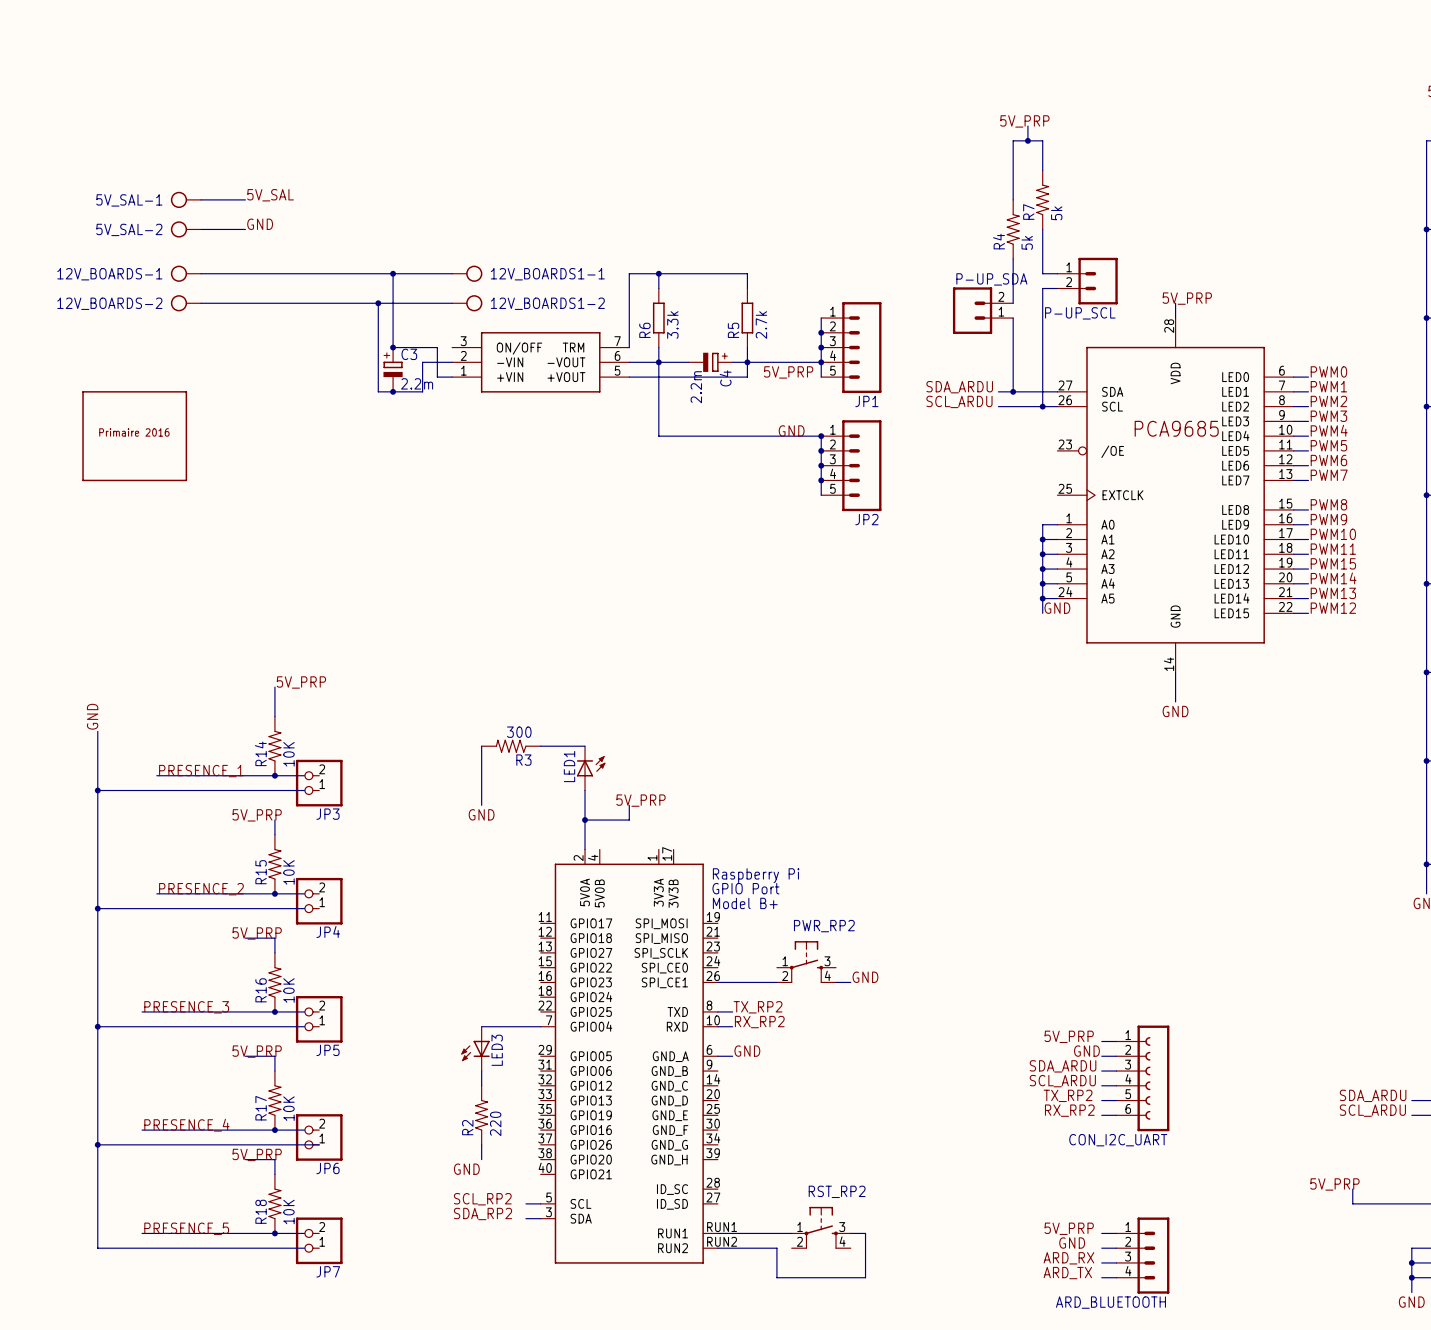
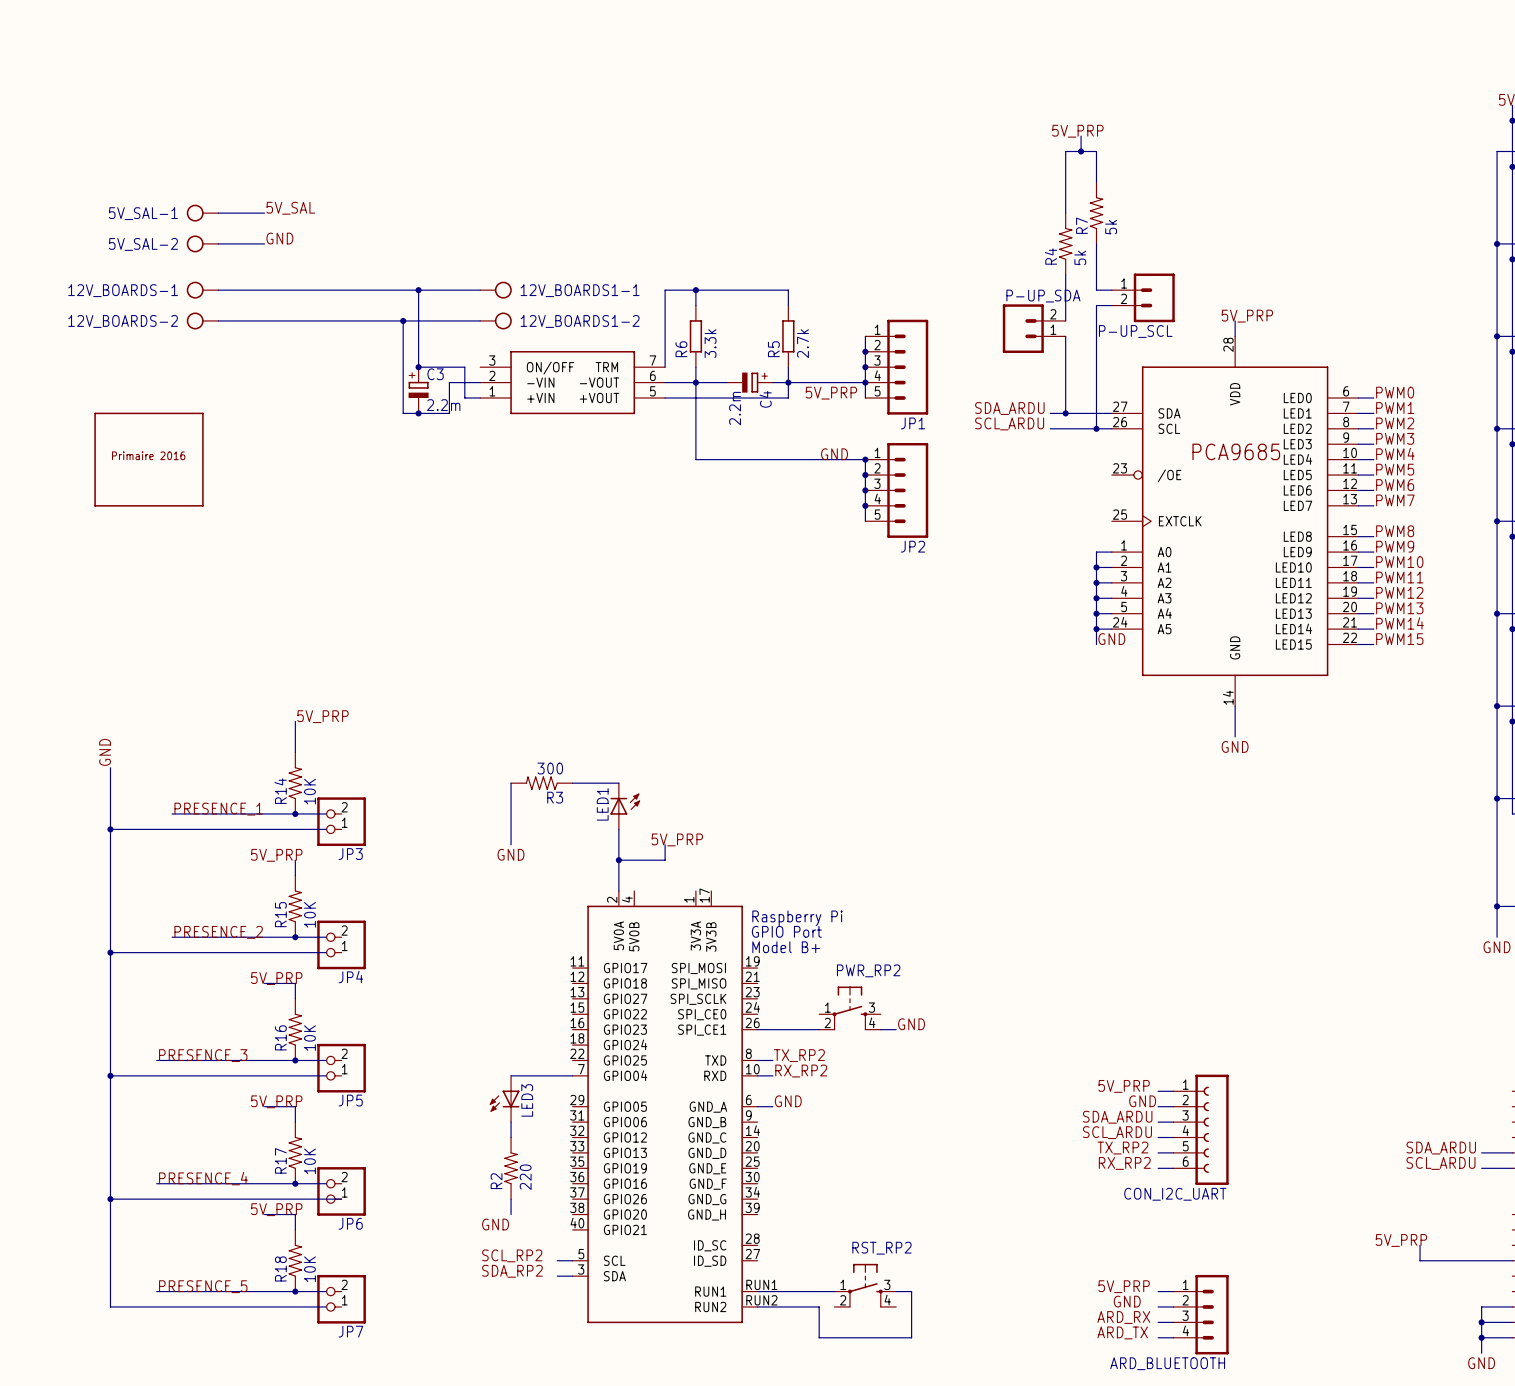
label: PWM15 (1333, 563) -> PWM12 (1399, 592)
label: PWM14 (1333, 578) -> PWM13 (1399, 608)
label: PWM13 (1333, 593) -> PWM14 (1400, 623)
label: PWM12 (1333, 608) -> PWM15 (1399, 639)

